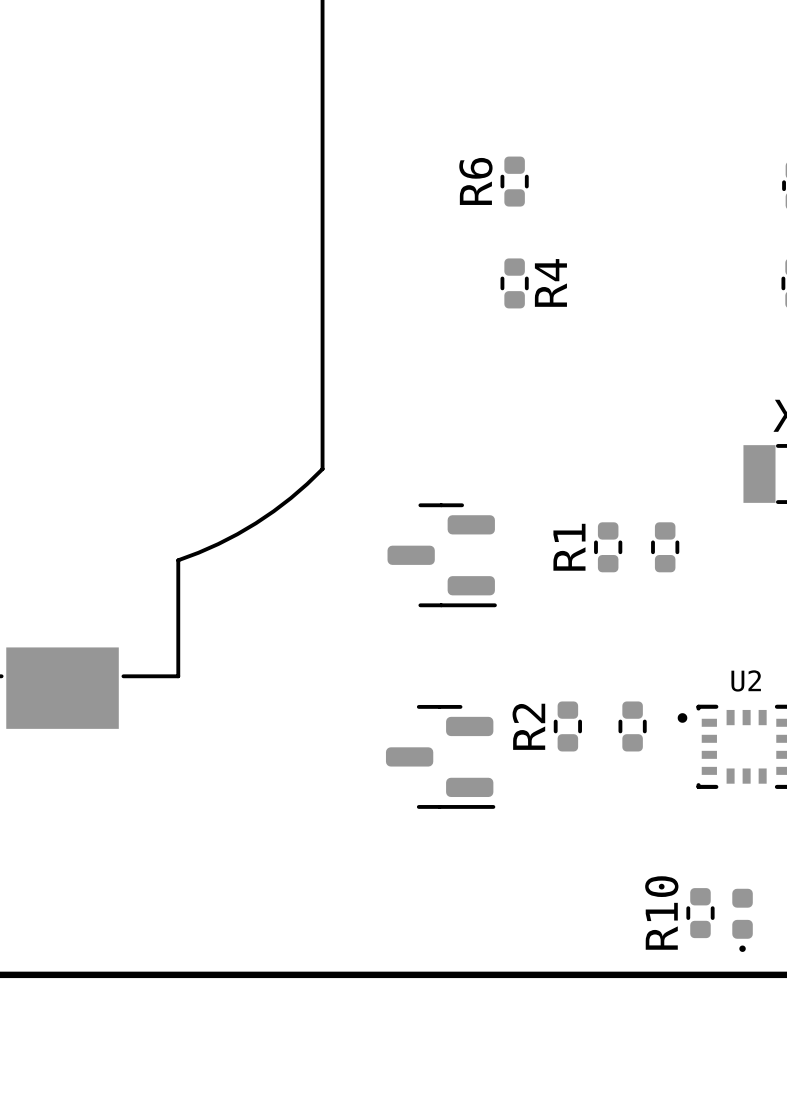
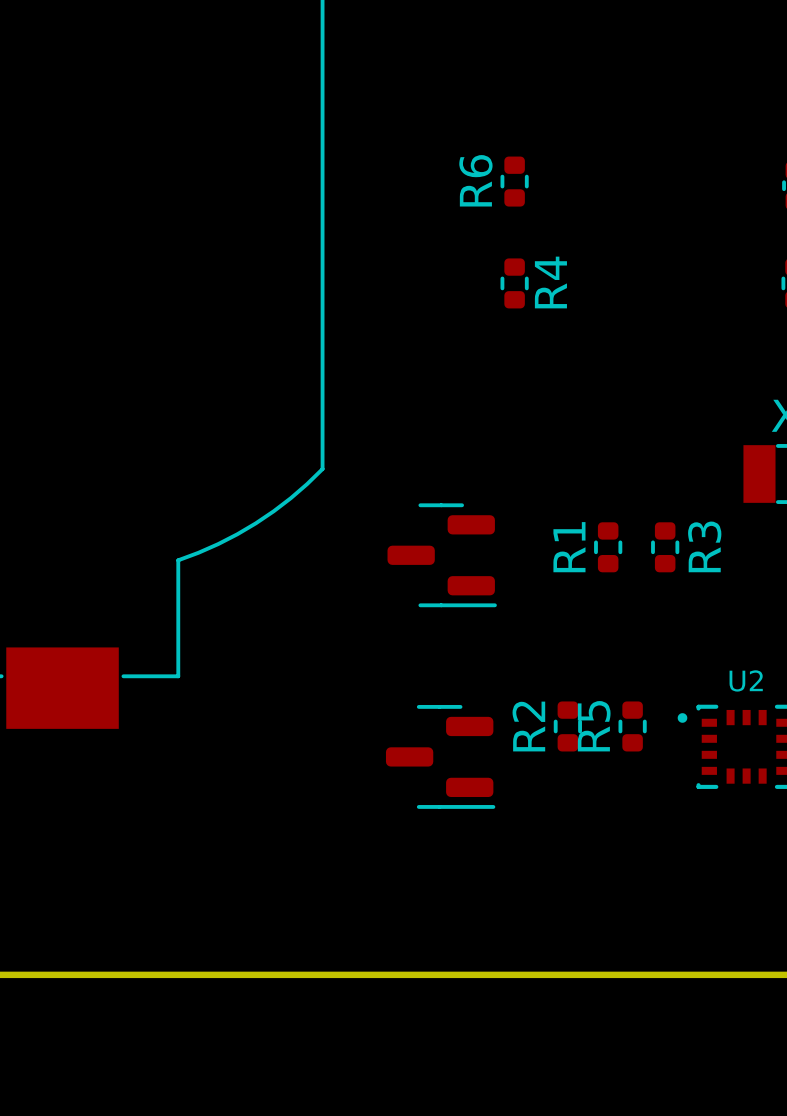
R3 name: none -> R3 (704, 546)
R5 name: none -> R5 (594, 726)
R10: (700, 913) -> none
part: (742, 920) -> none

